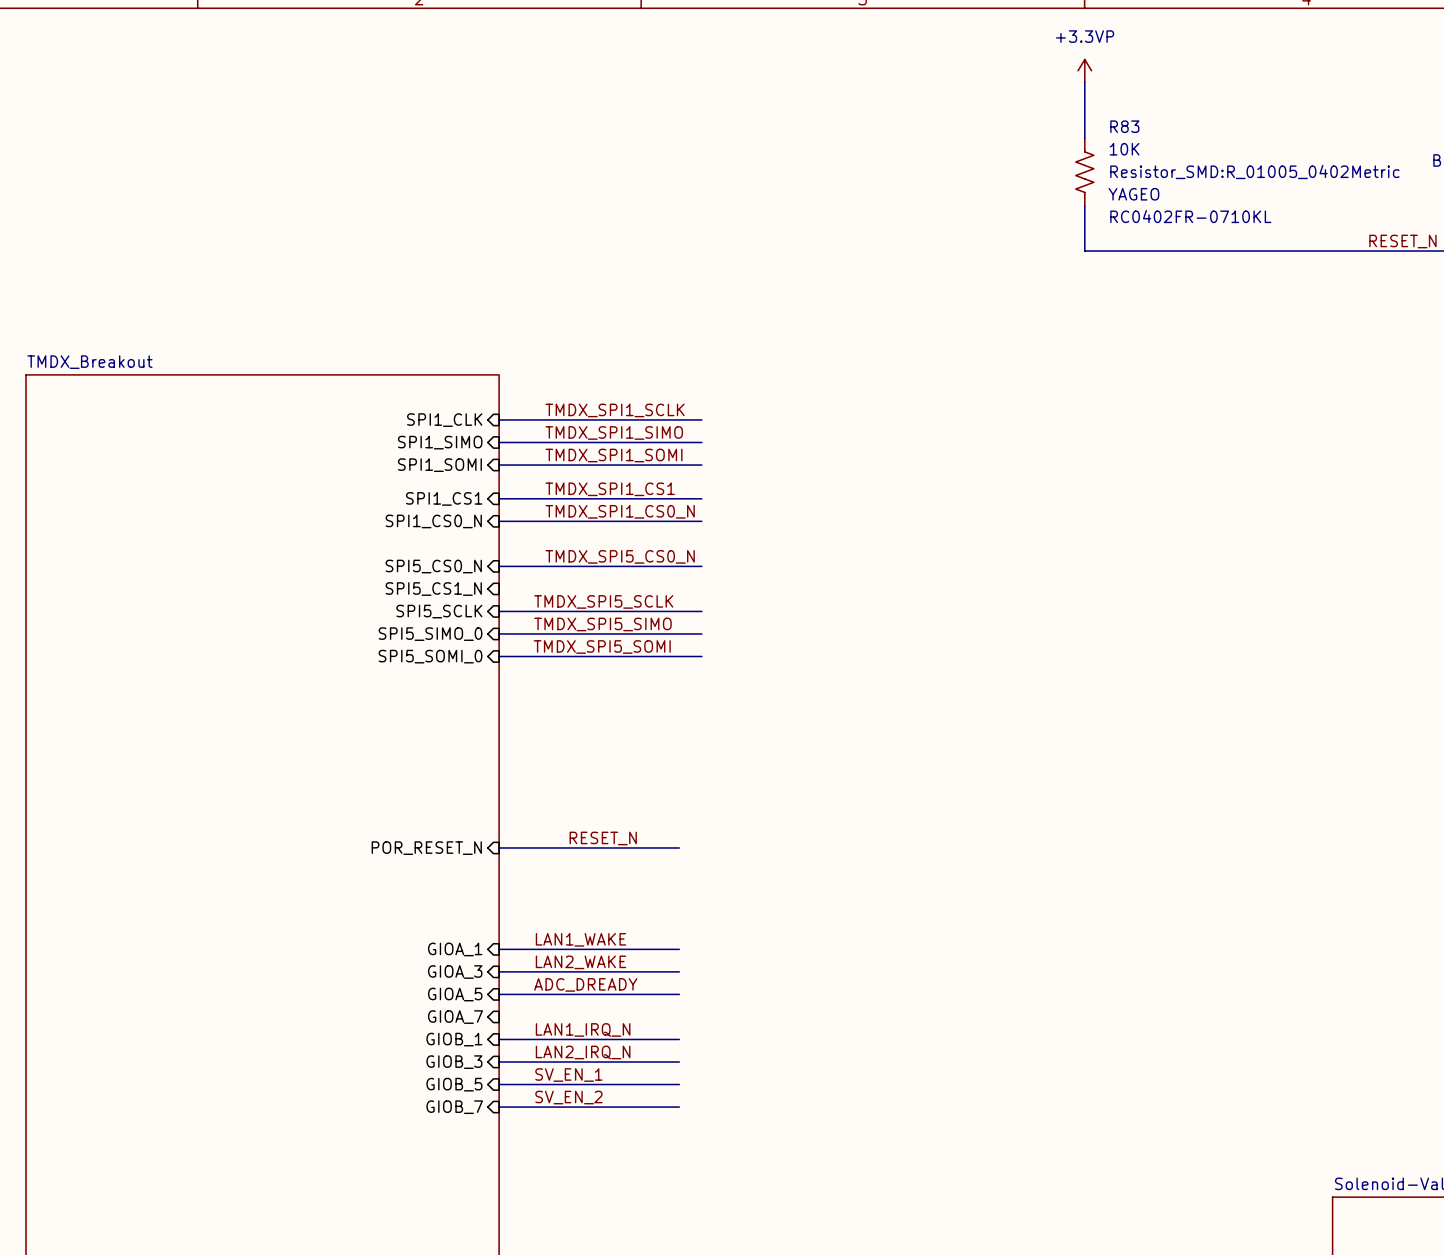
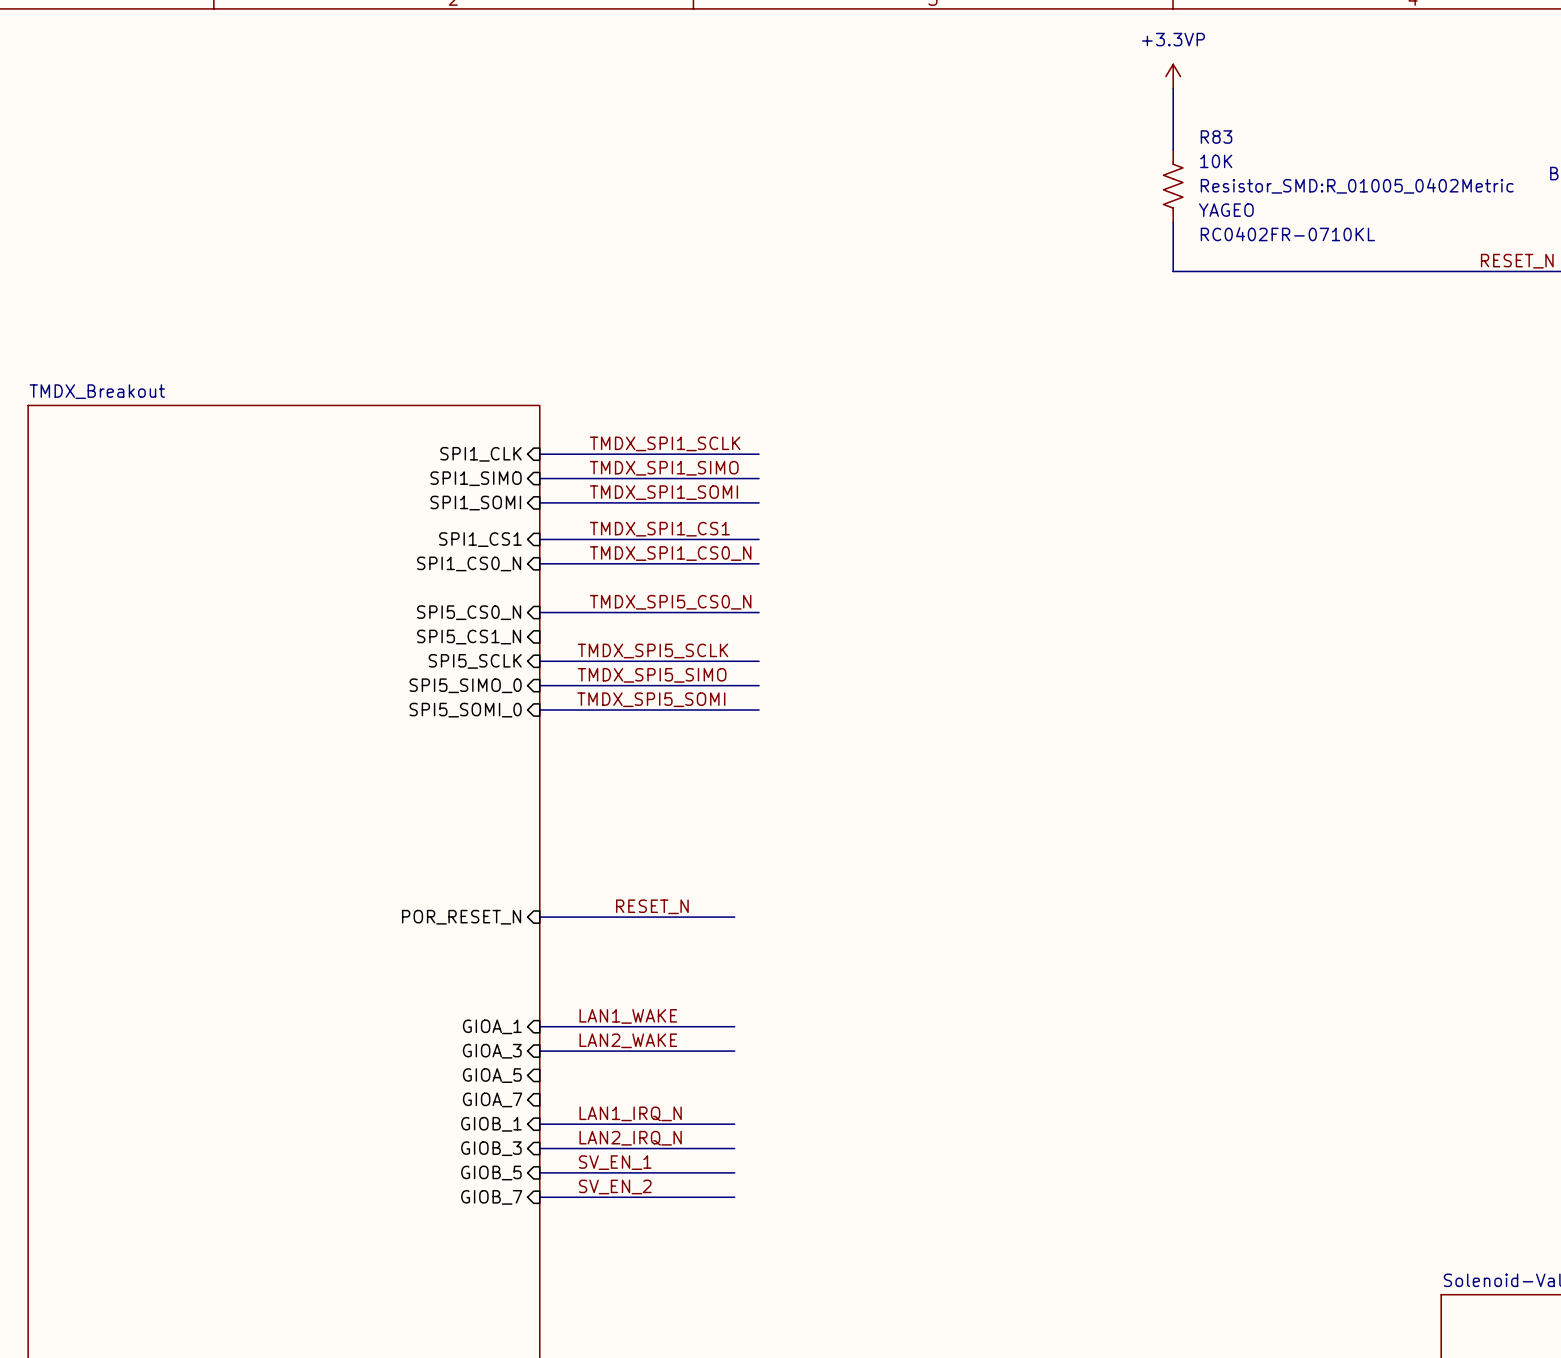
label: ADC_DREADY (585, 984) -> none
wire: (499, 994) (679, 994) -> none

